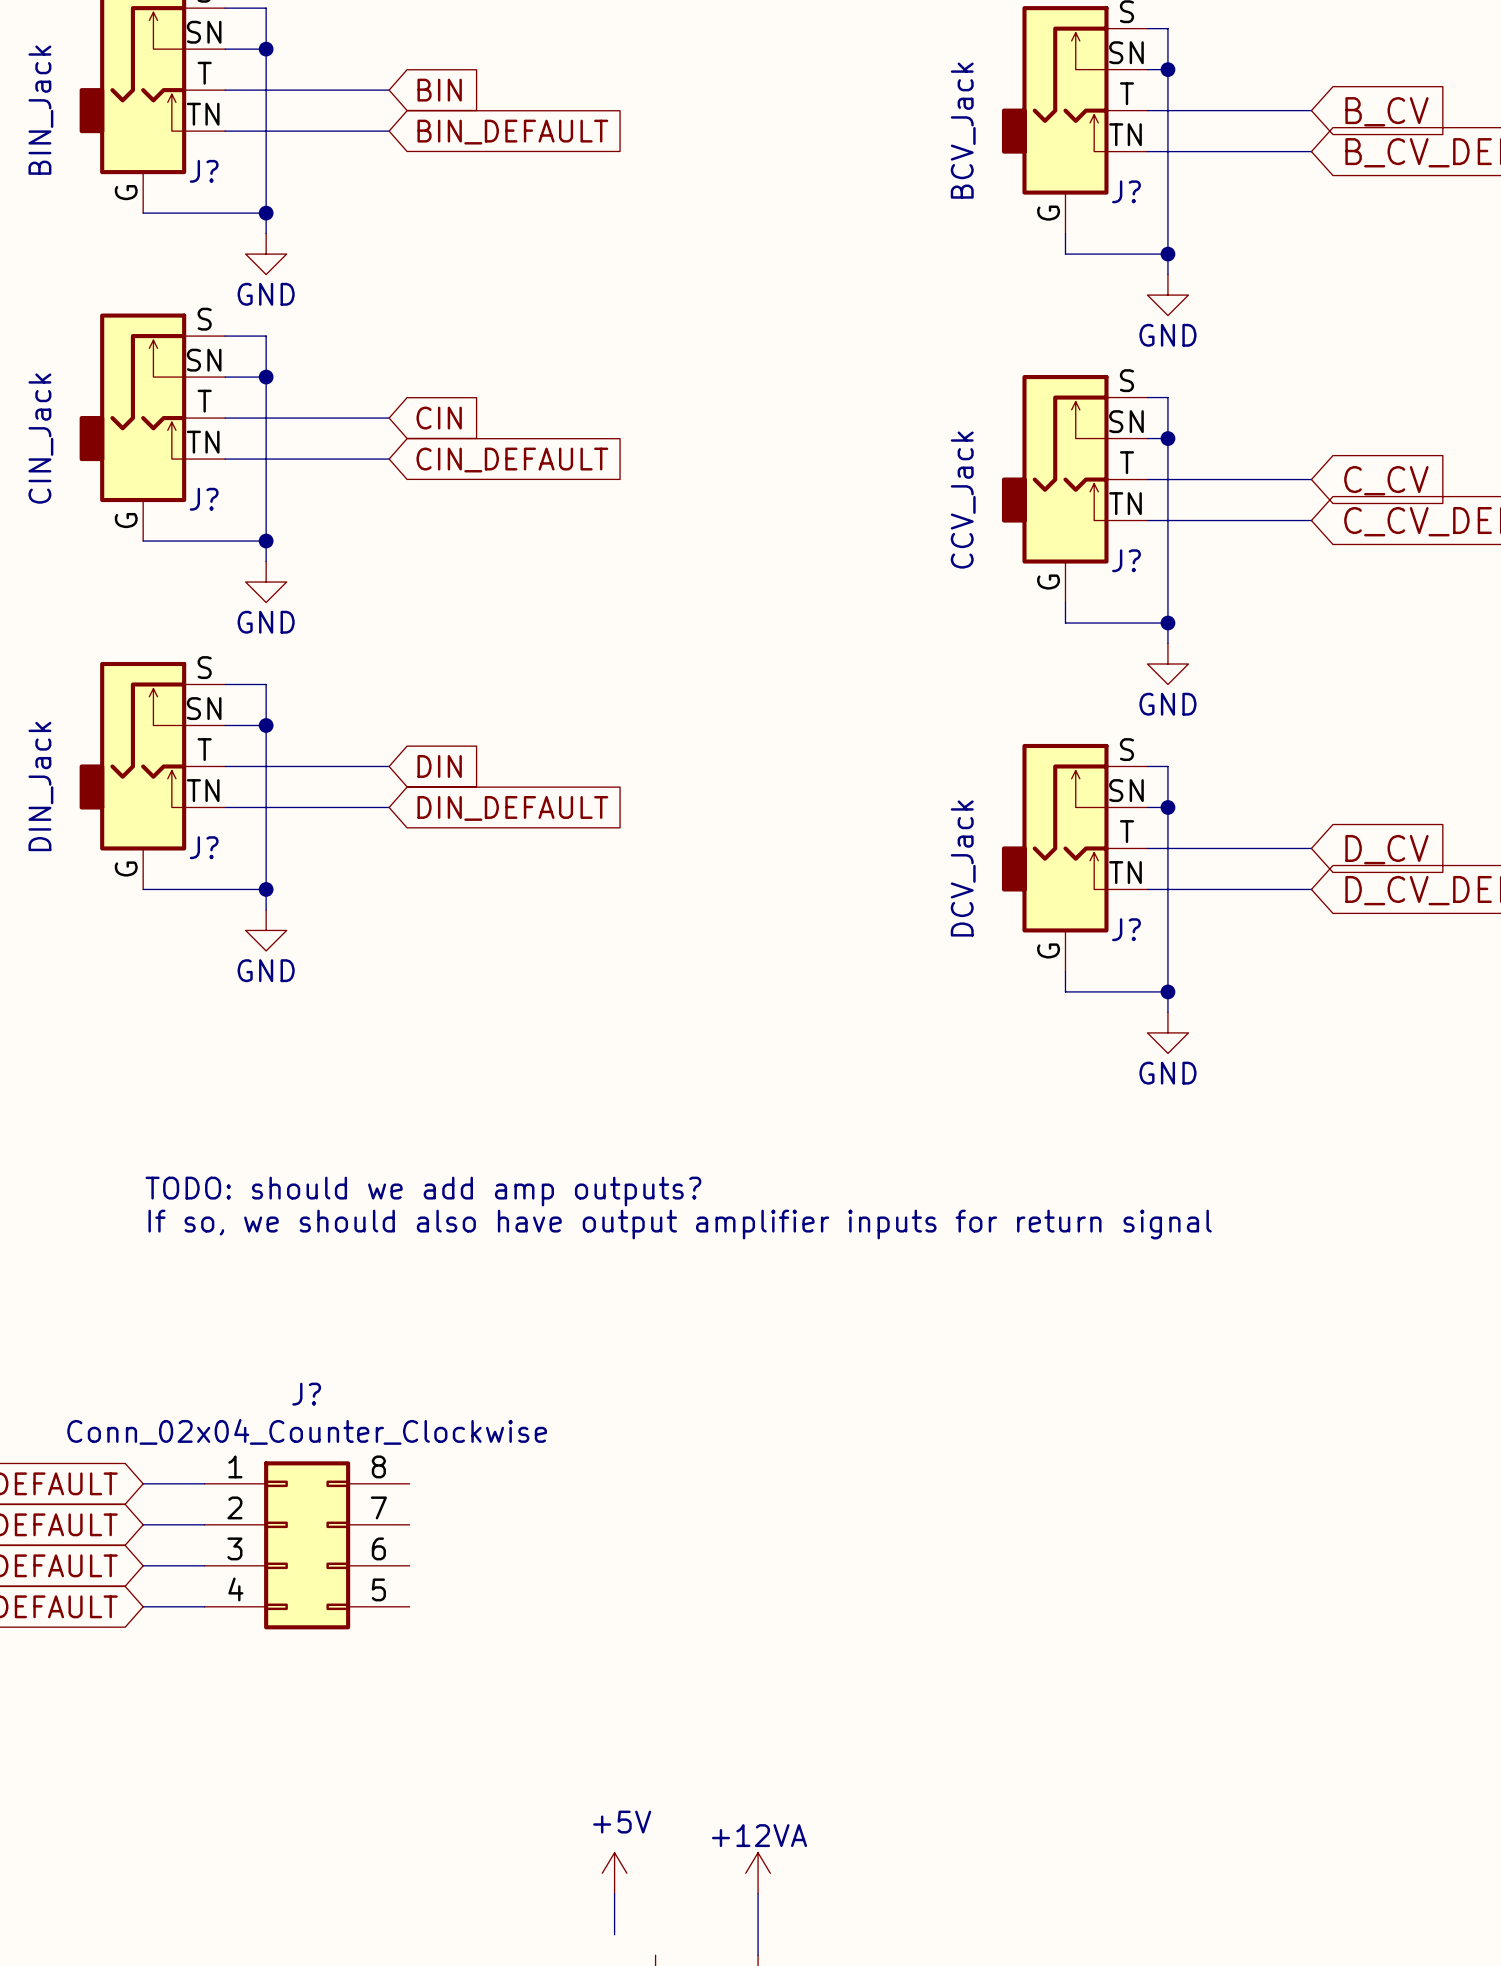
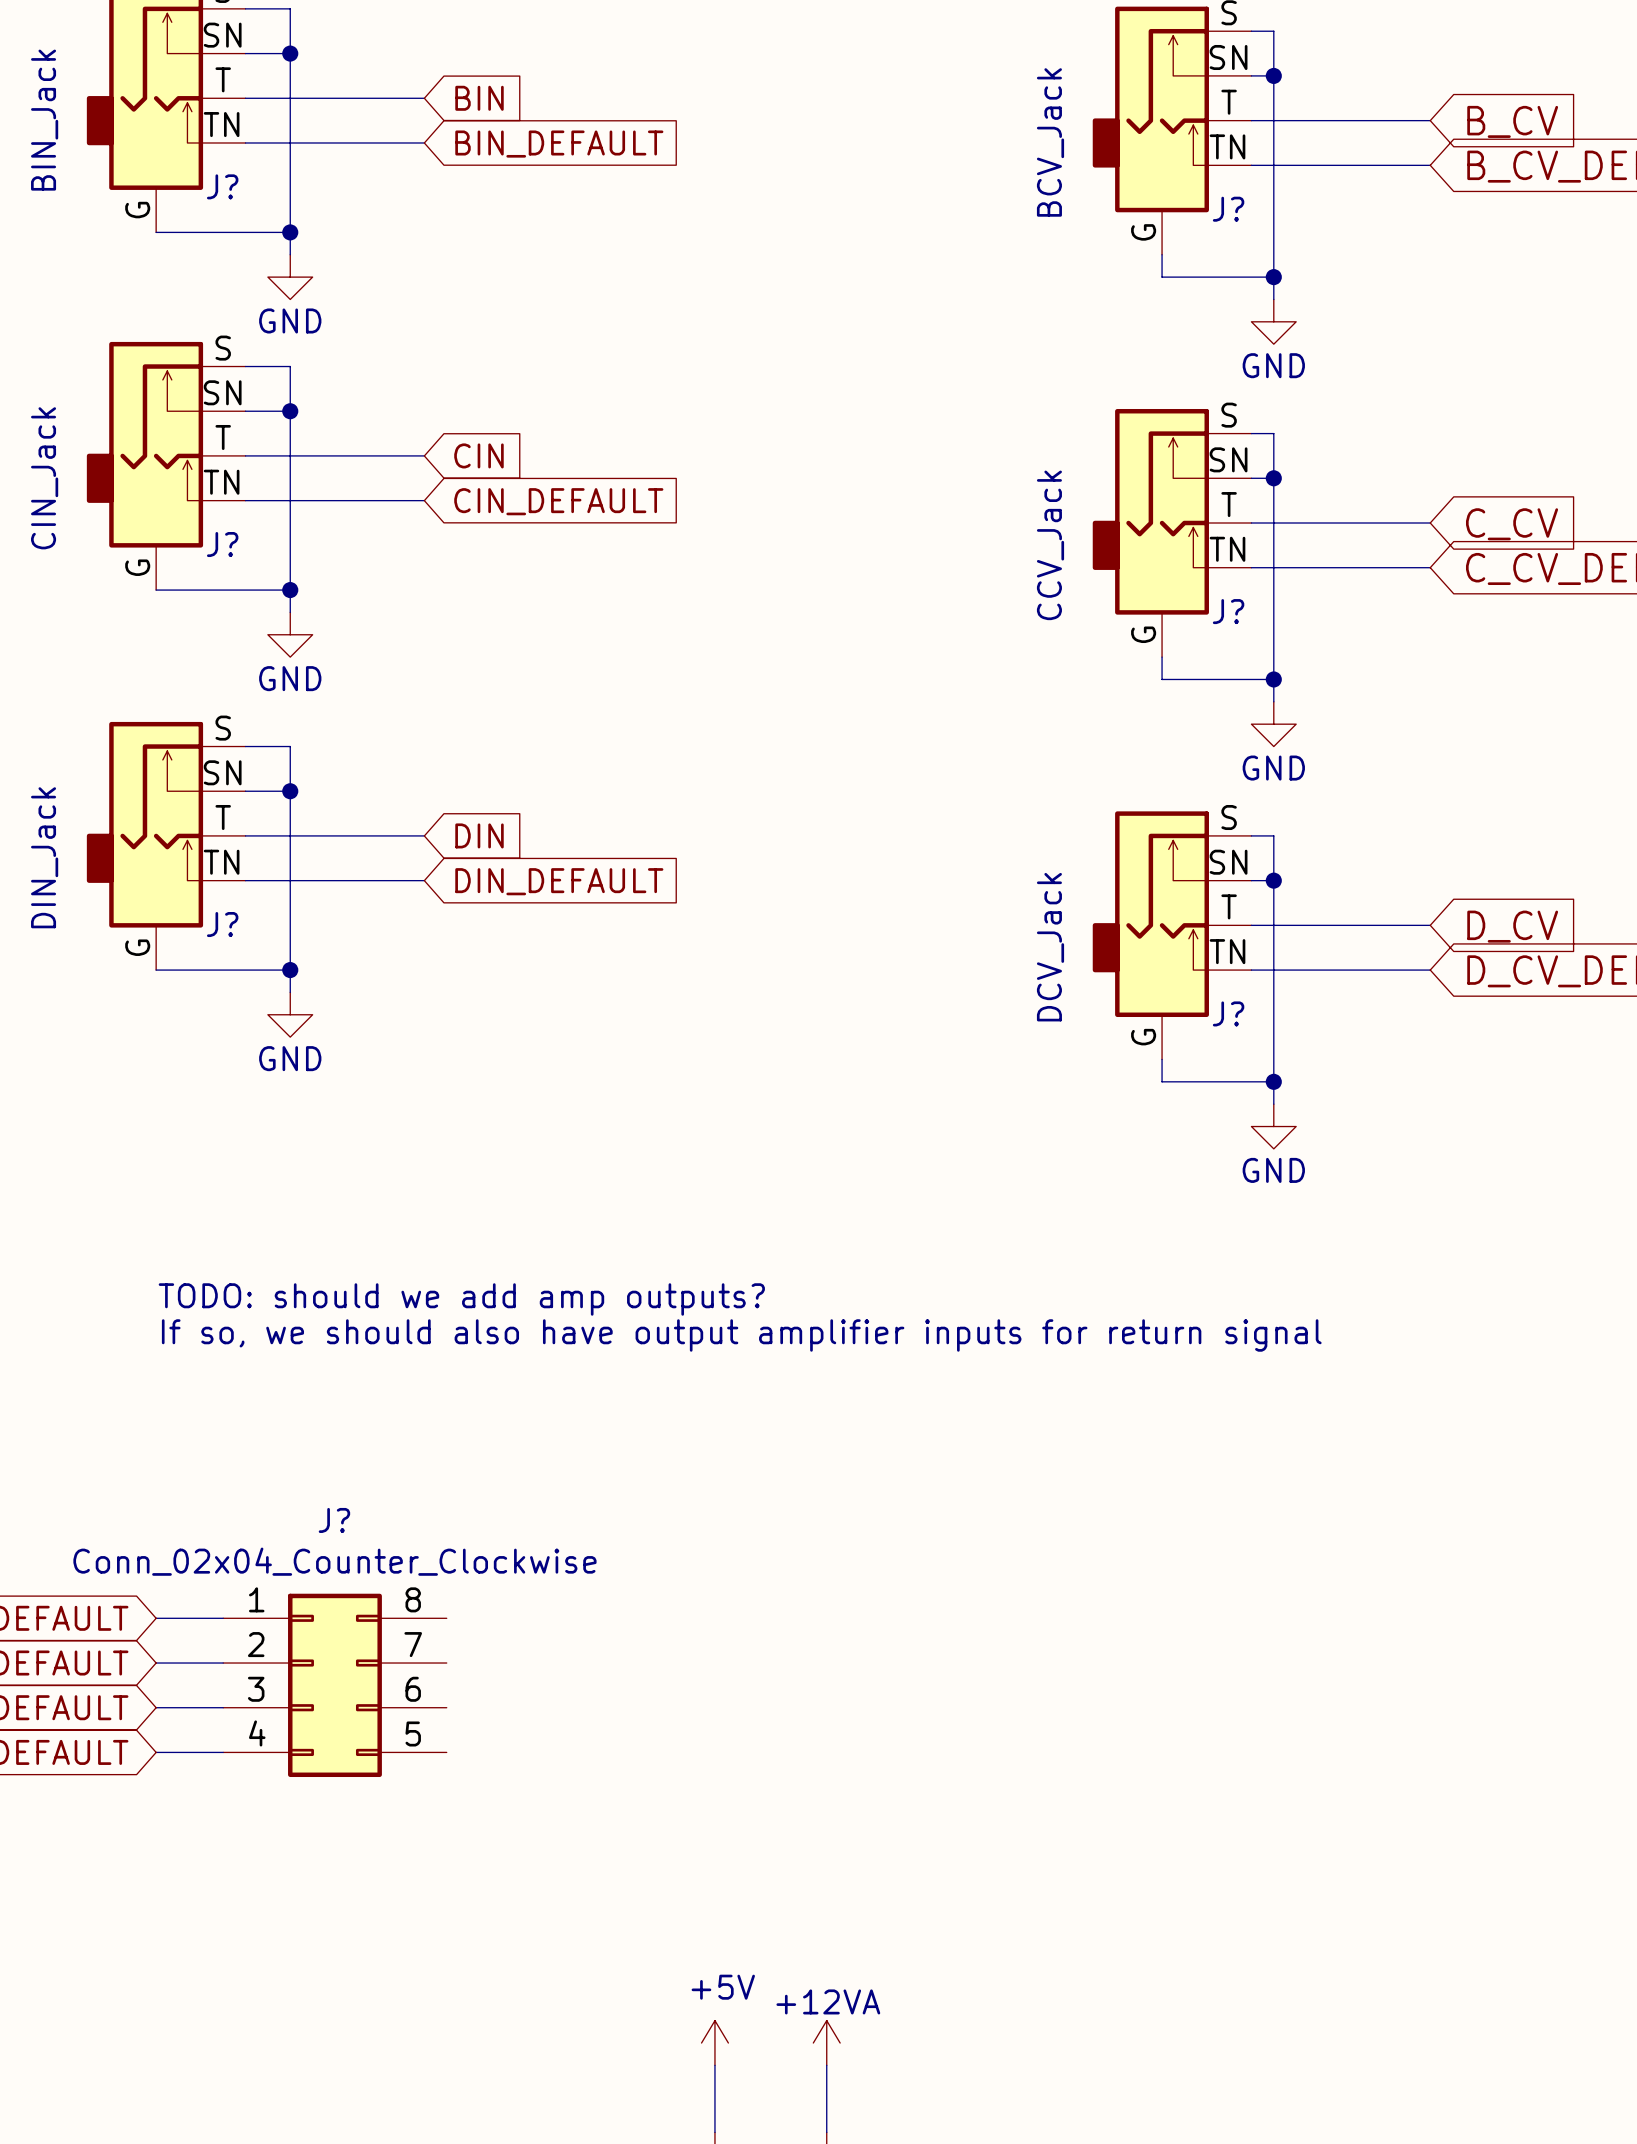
power symbol position: +5V (614, 1873) -> +5V (714, 2043)
wire: (614, 1893) (614, 1934) -> none
wire: none -> (714, 2065) (714, 2132)

